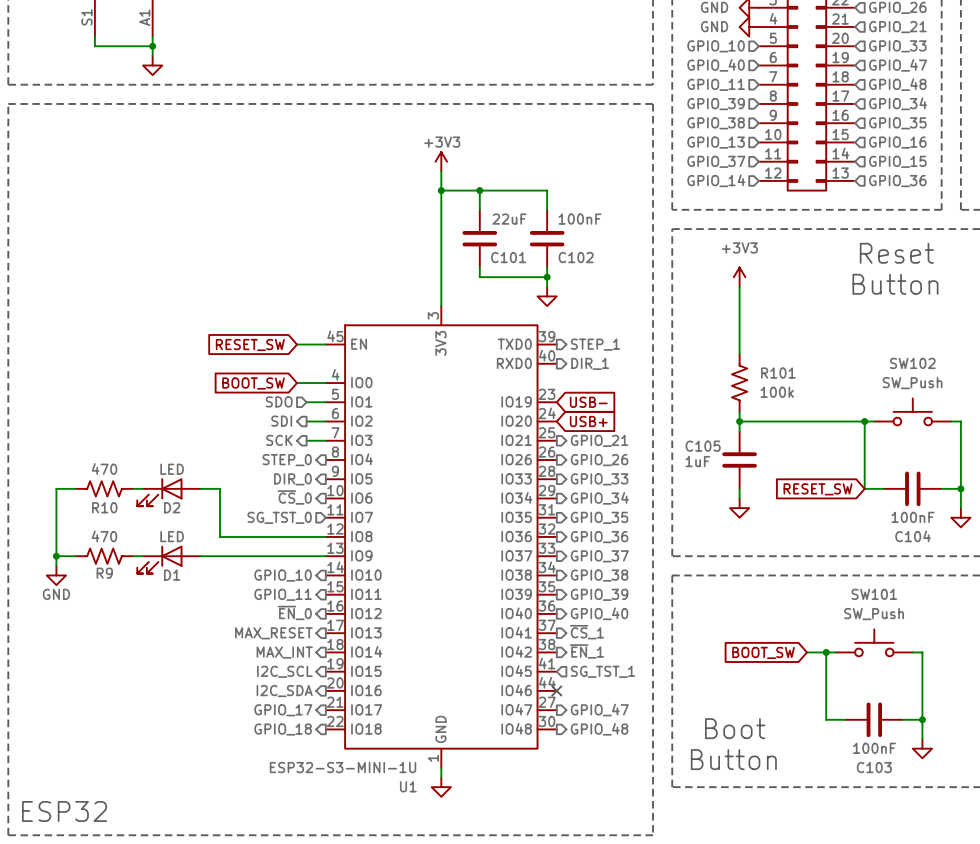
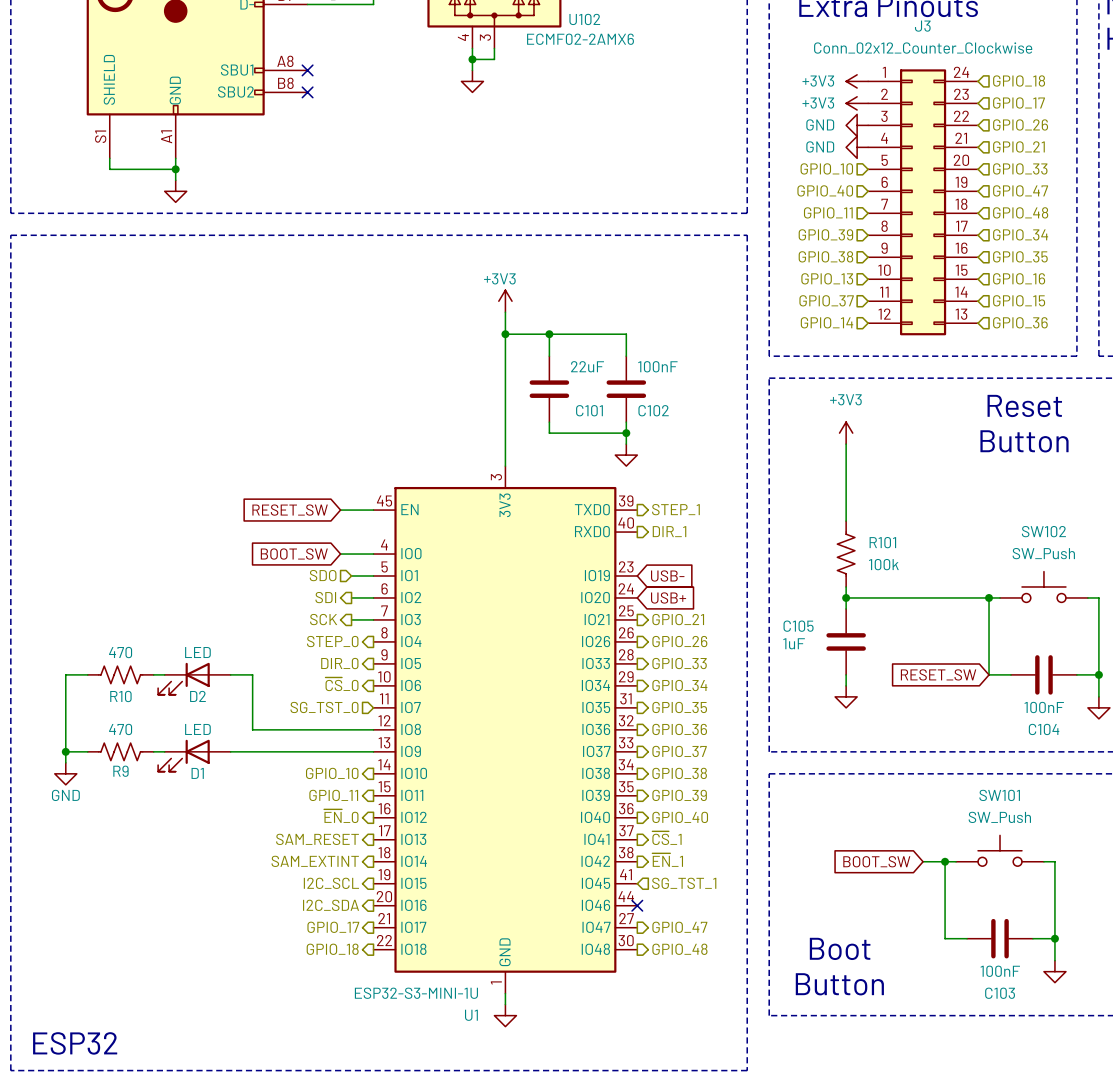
hierarchical label: MAX_RESET (273, 633) -> SAM_RESET (317, 839)
hierarchical label: MAX_INT (284, 652) -> SAM_EXTINT (315, 861)

